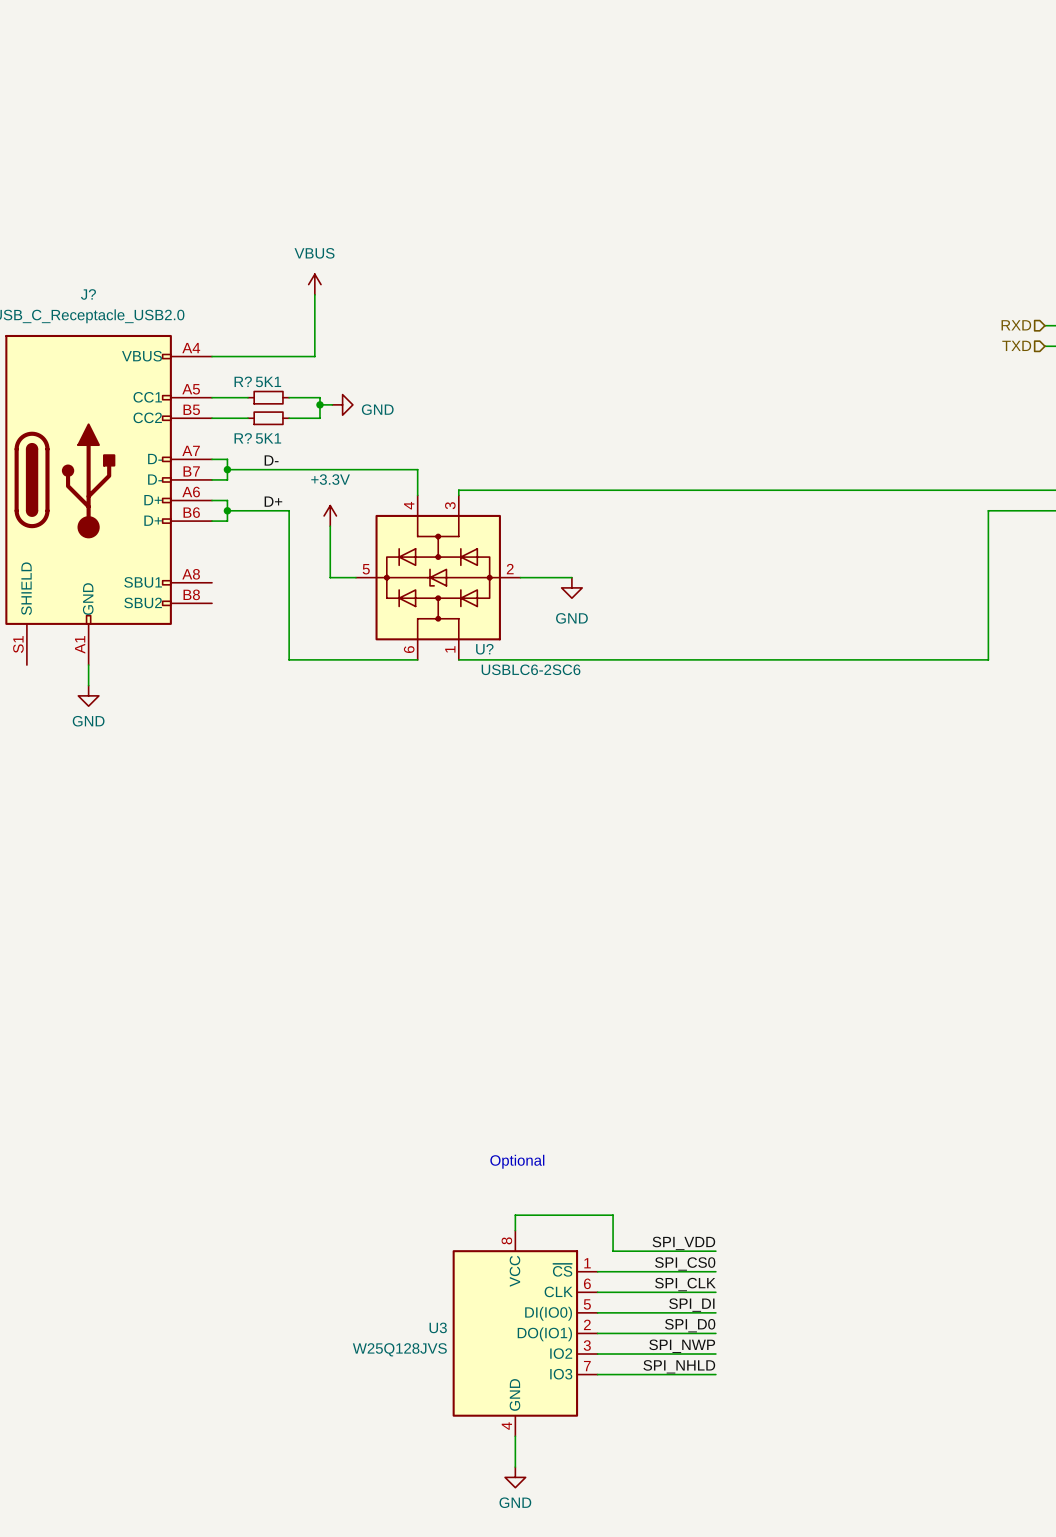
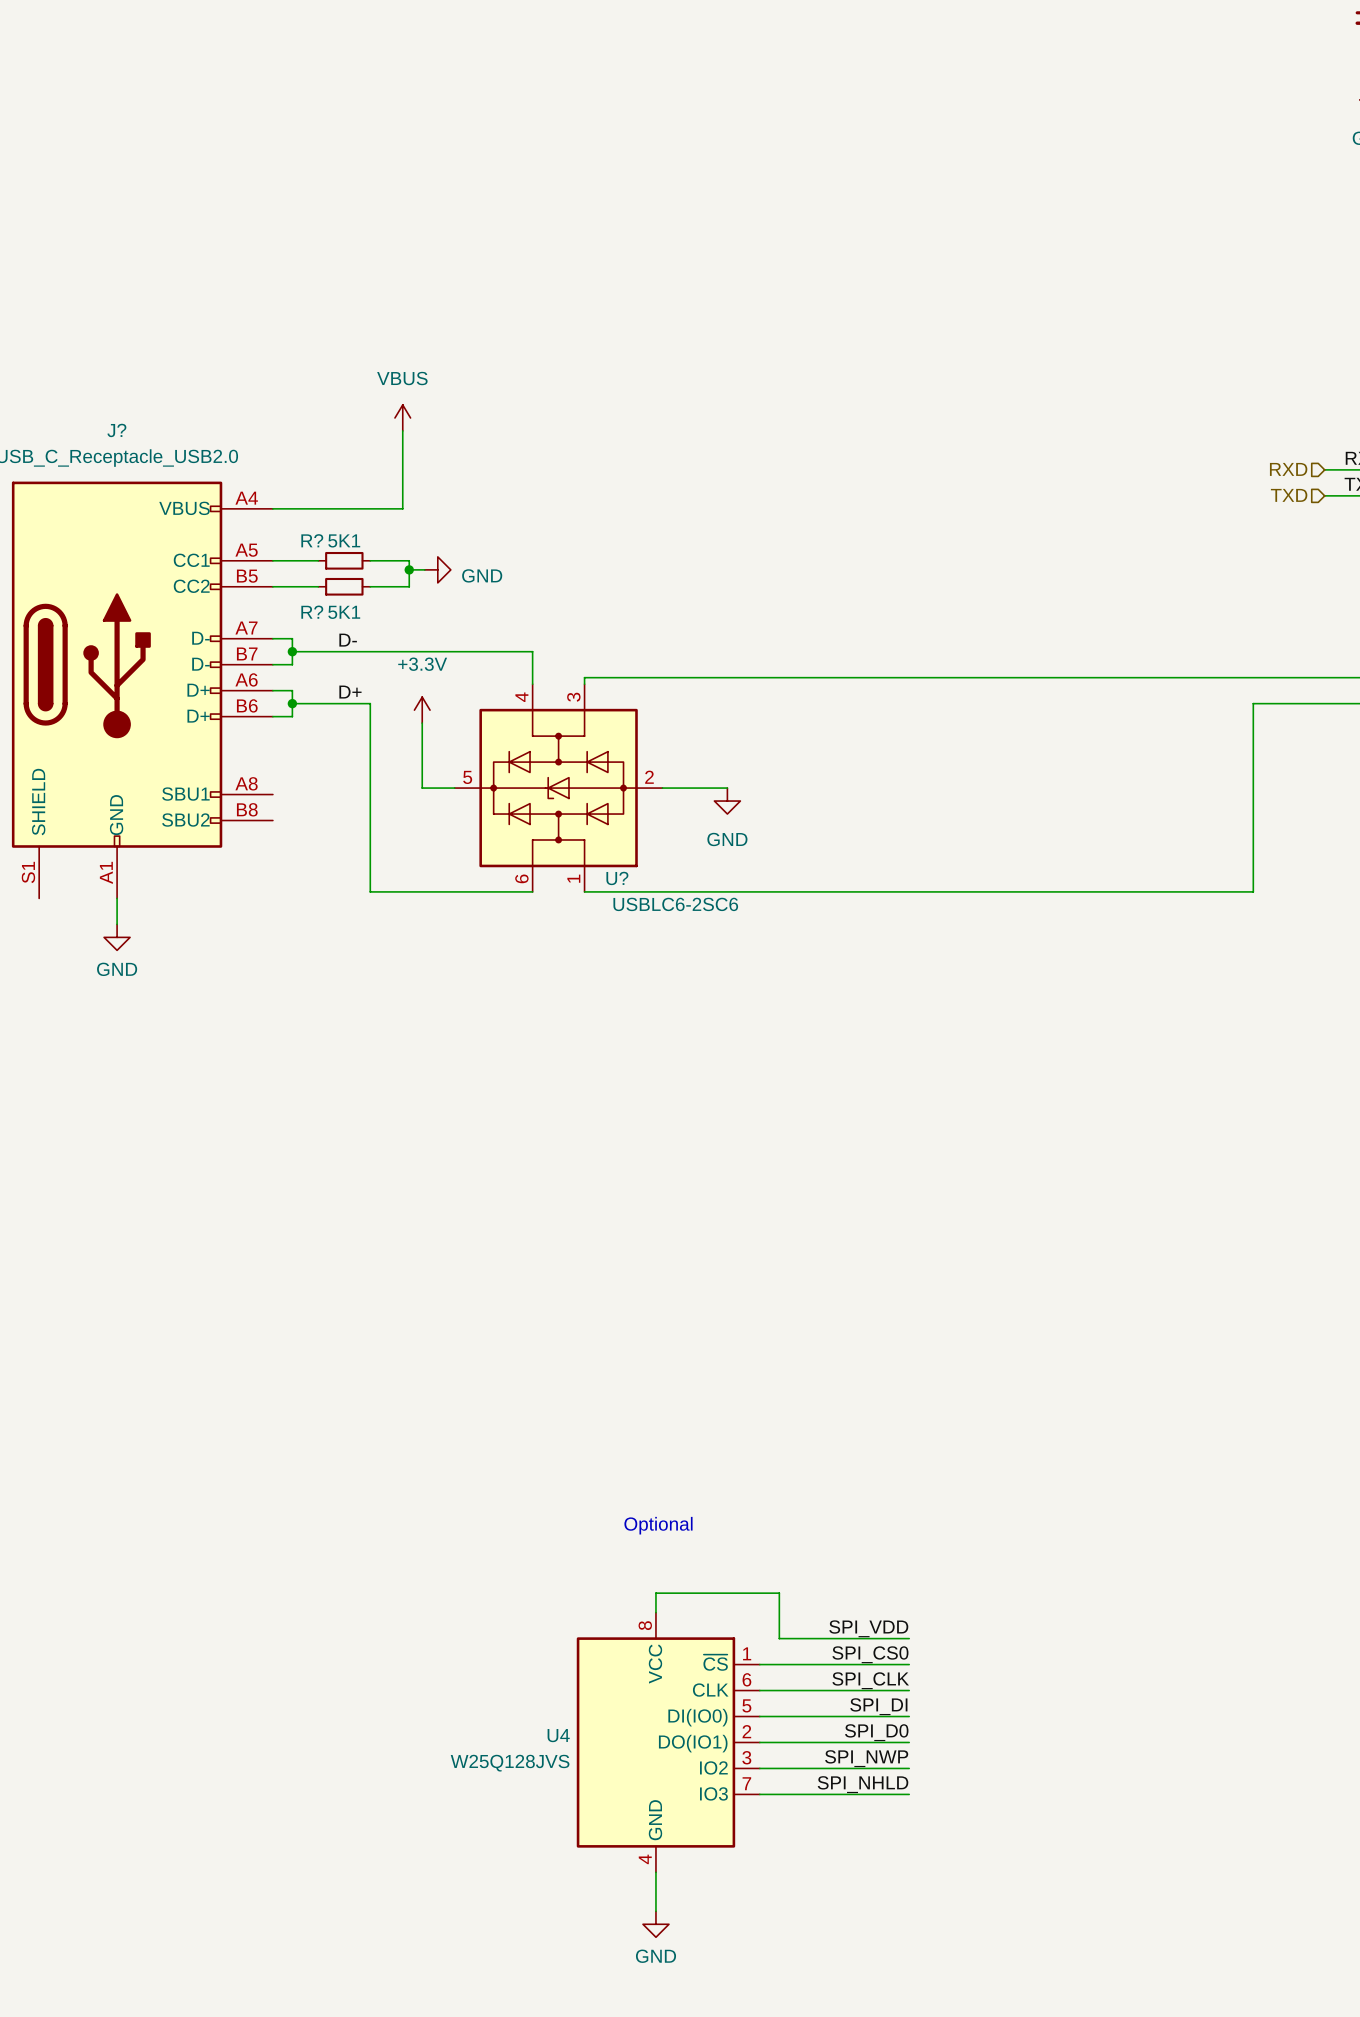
U3 name: U3 (438, 1327) -> U4 (558, 1735)

